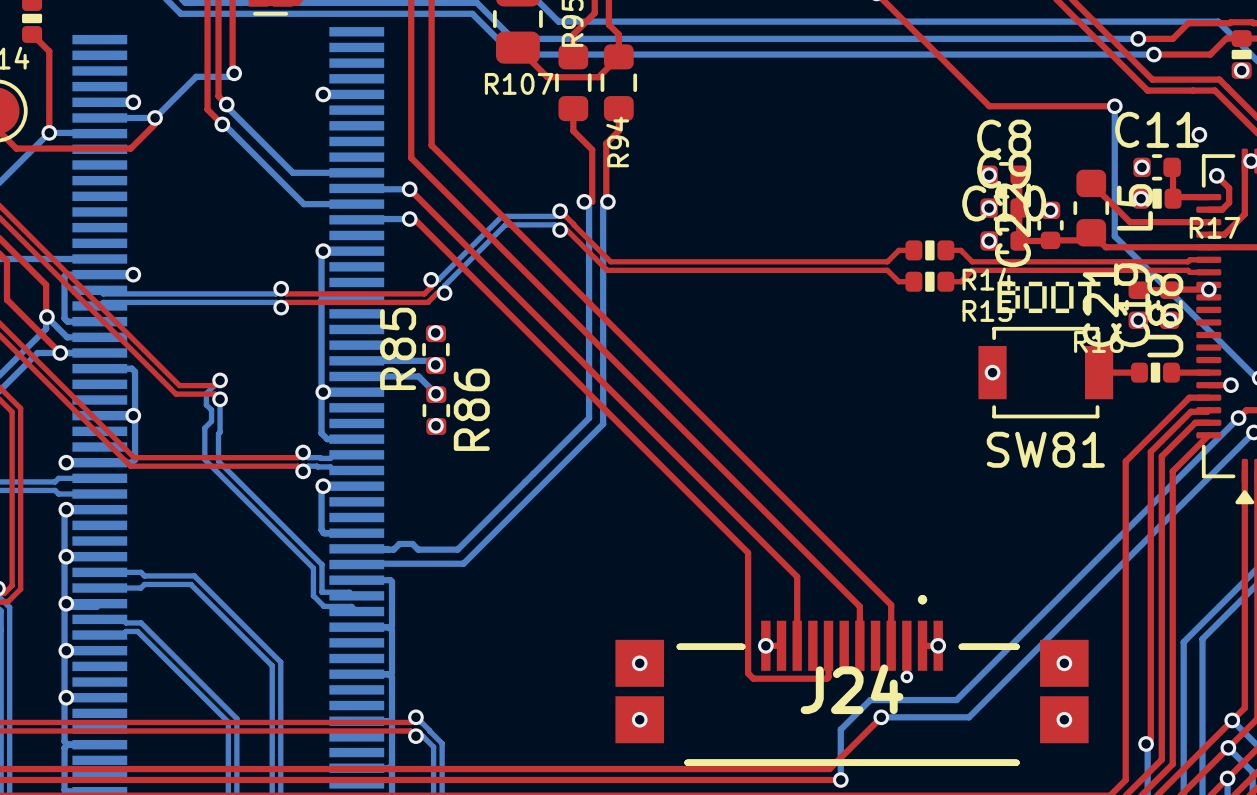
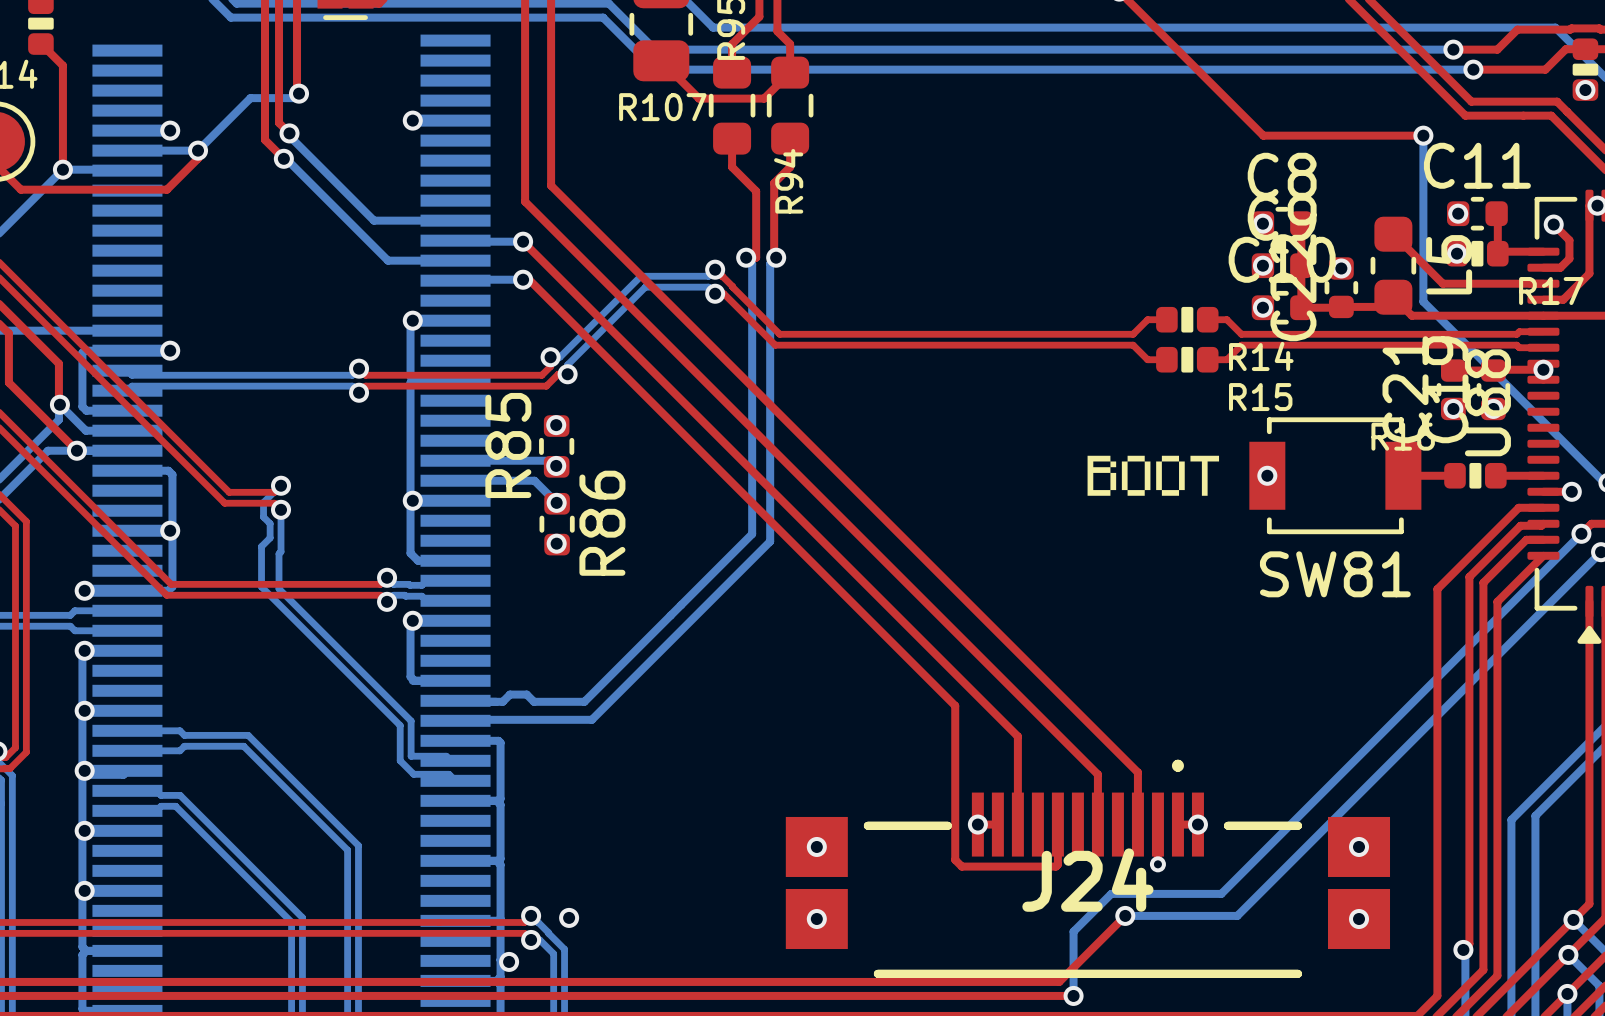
via: (1199, 134) -> none
drawing position: (1048, 297) -> (1153, 475)
via: none -> (569, 917)
via: none -> (509, 961)

